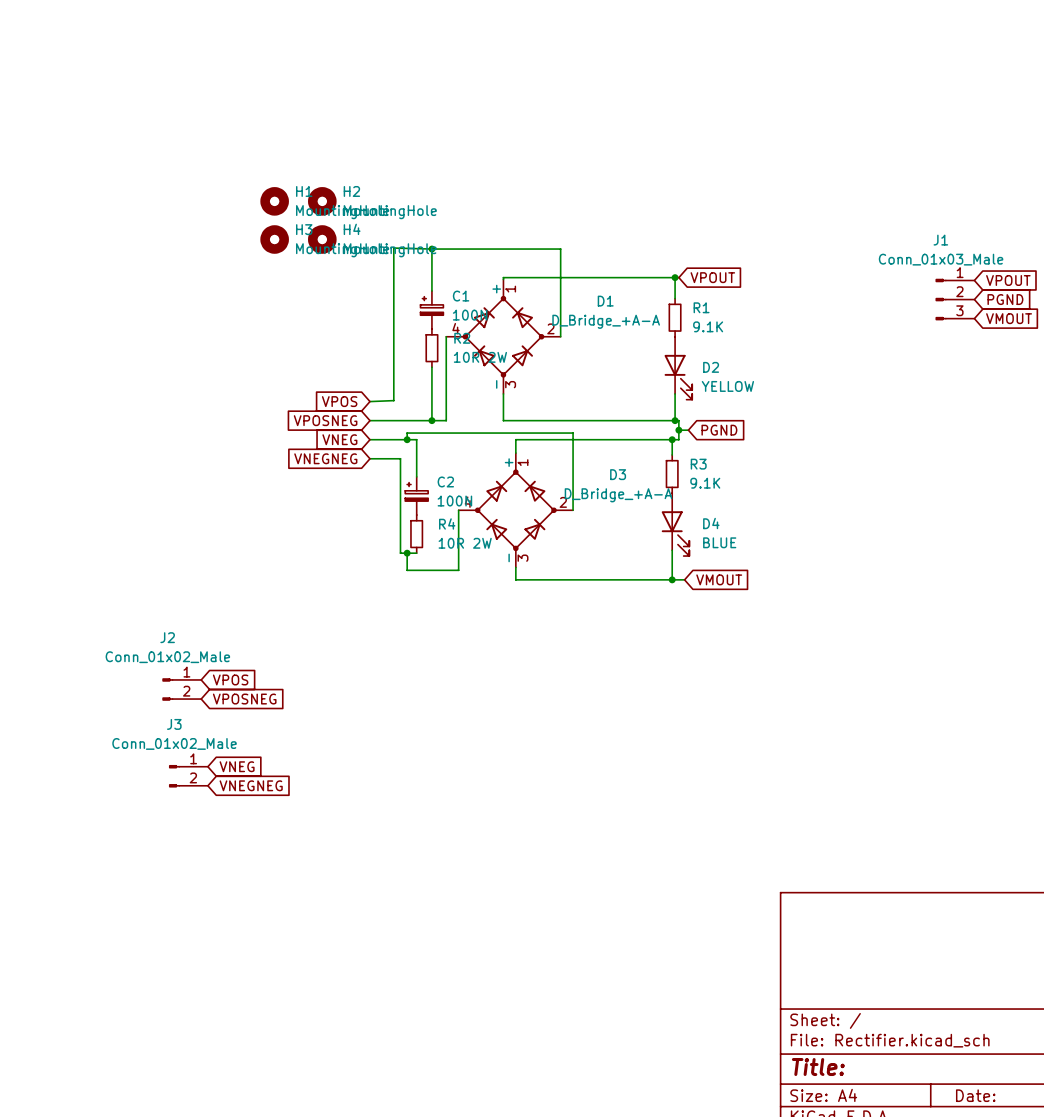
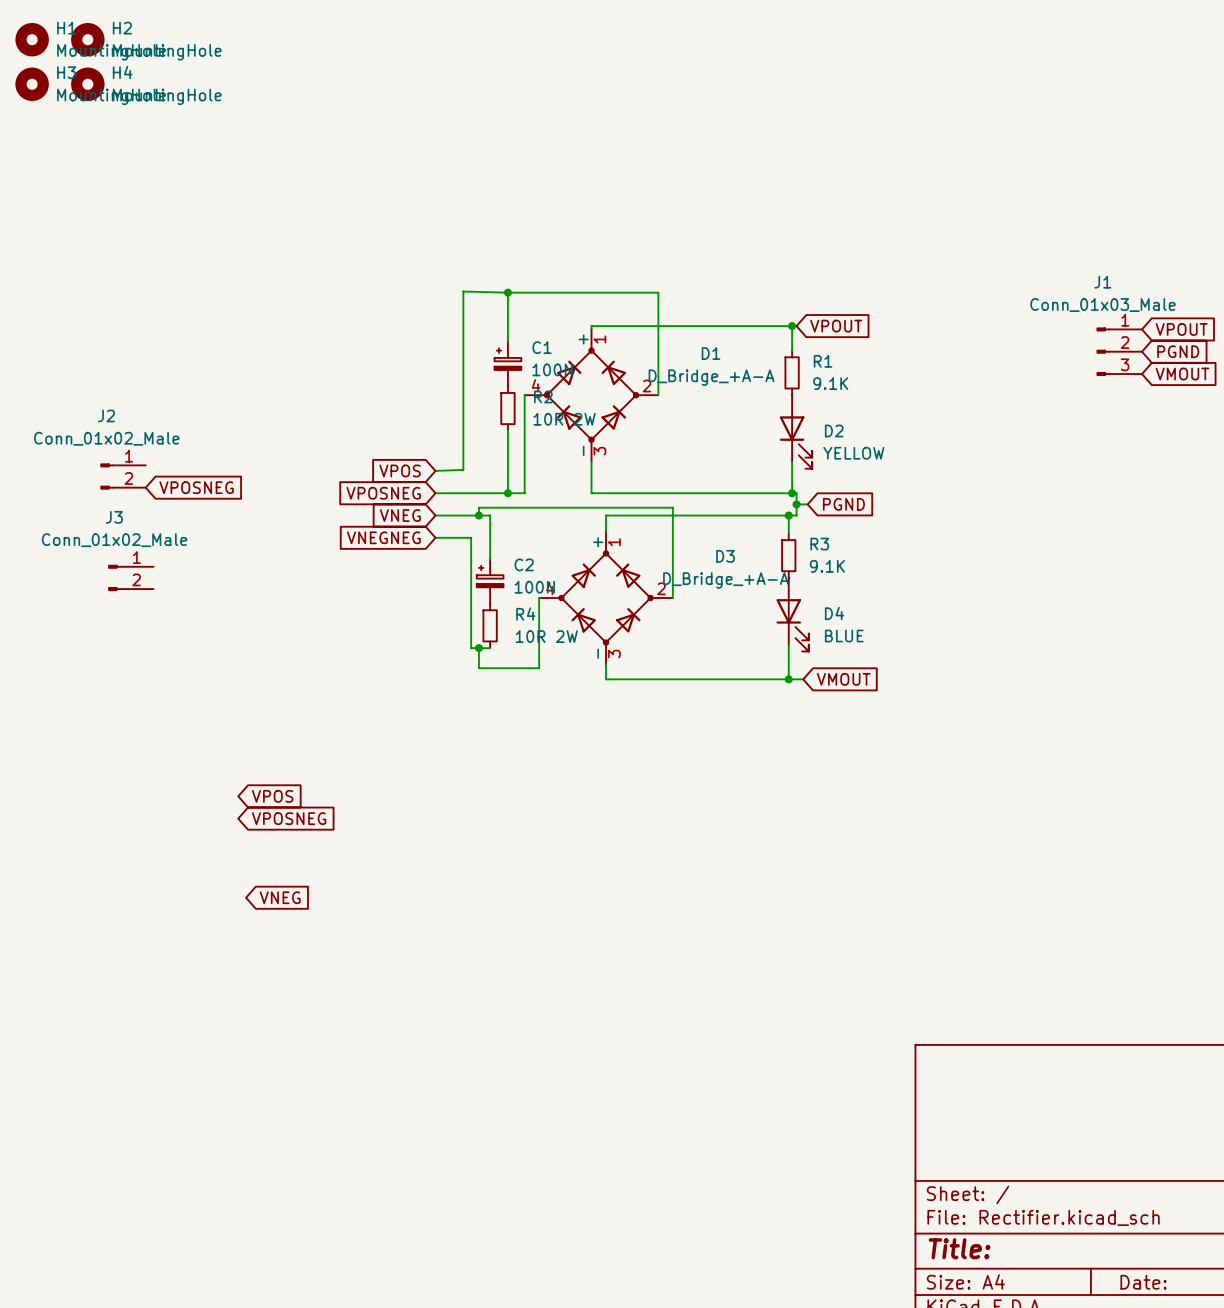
H1 position: (274, 201) -> (32, 39)
H2 position: (322, 201) -> (87, 39)
H3 position: (274, 239) -> (32, 84)
H4 position: (322, 239) -> (87, 84)
global label: none -> VPOSNEG (196, 487)
J2 position: (181, 689) -> (123, 476)
J3 position: (188, 776) -> (130, 577)
global label: VNEGNEG (251, 785) -> none

